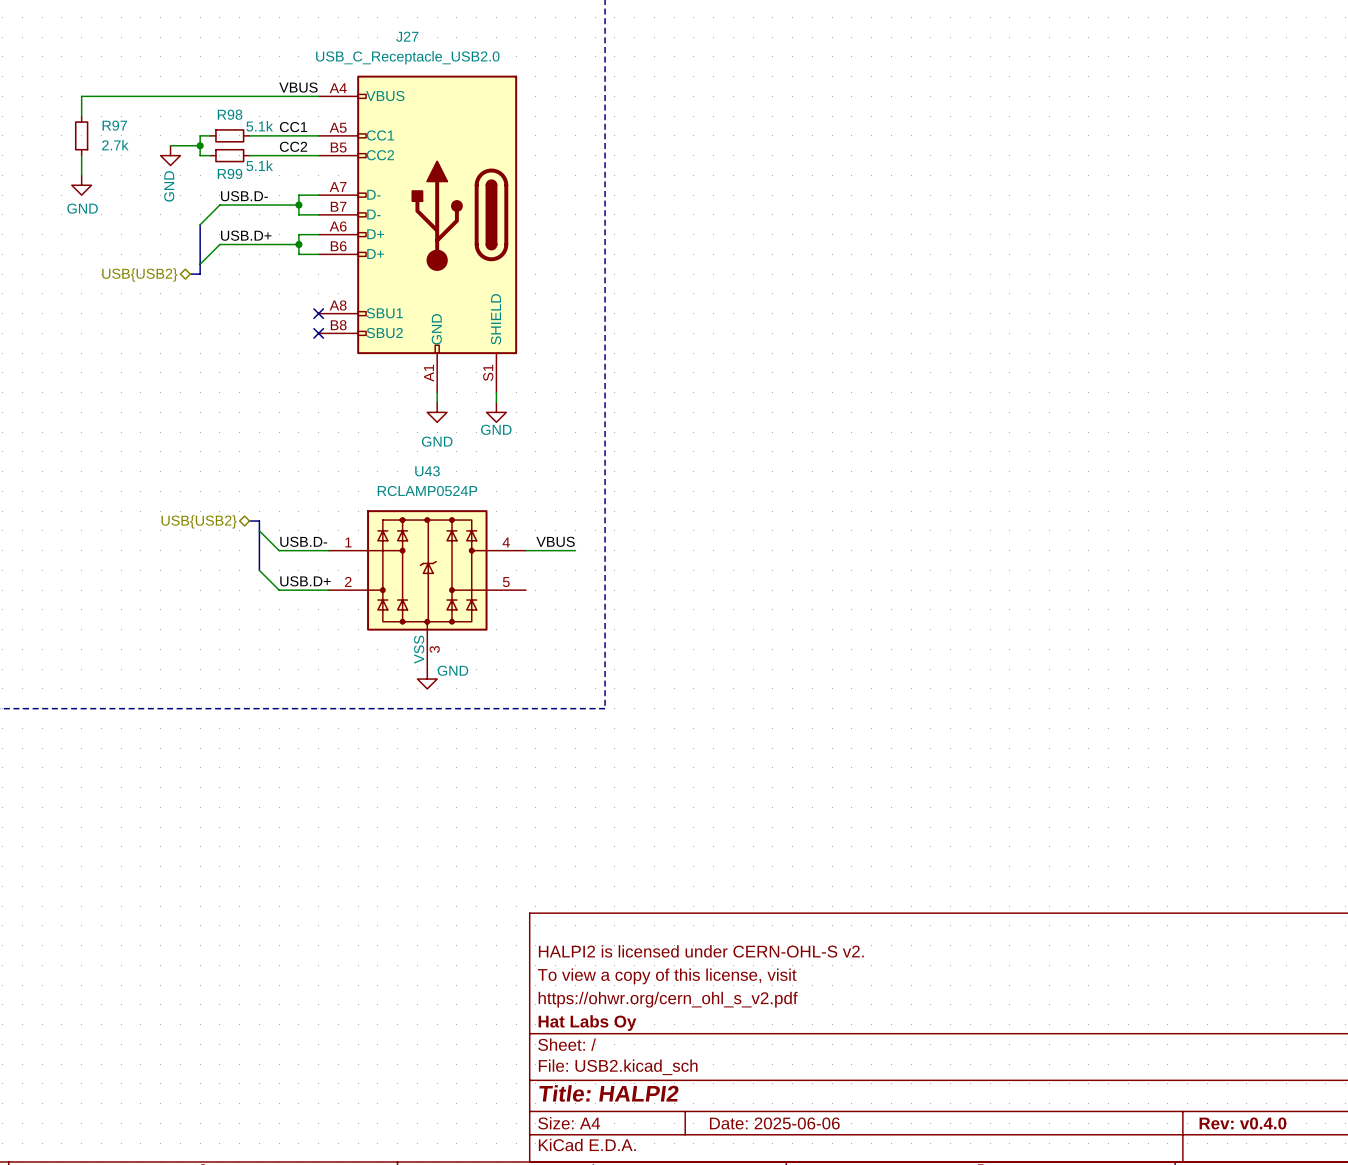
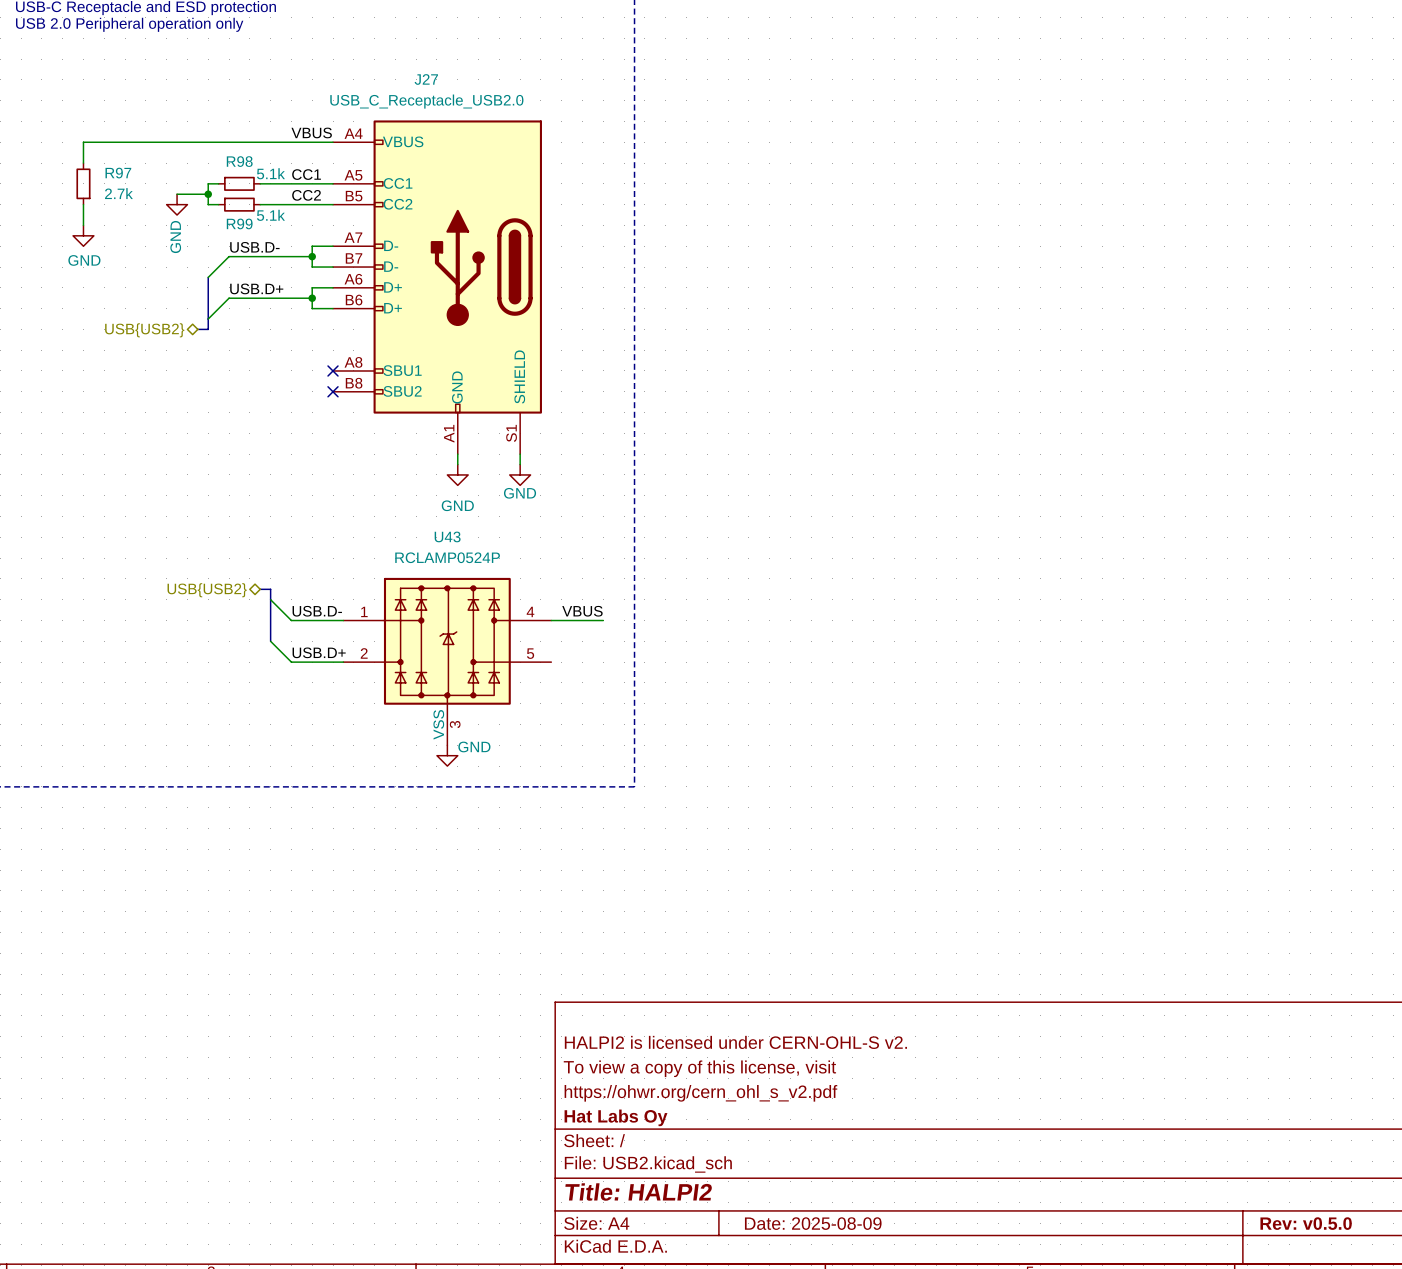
title block: Date: 2025-06-06 (774, 1123) -> Date: 2025-08-09 (813, 1223)
title block: Rev: v0.4.0 (1242, 1123) -> Rev: v0.5.0 (1306, 1223)

